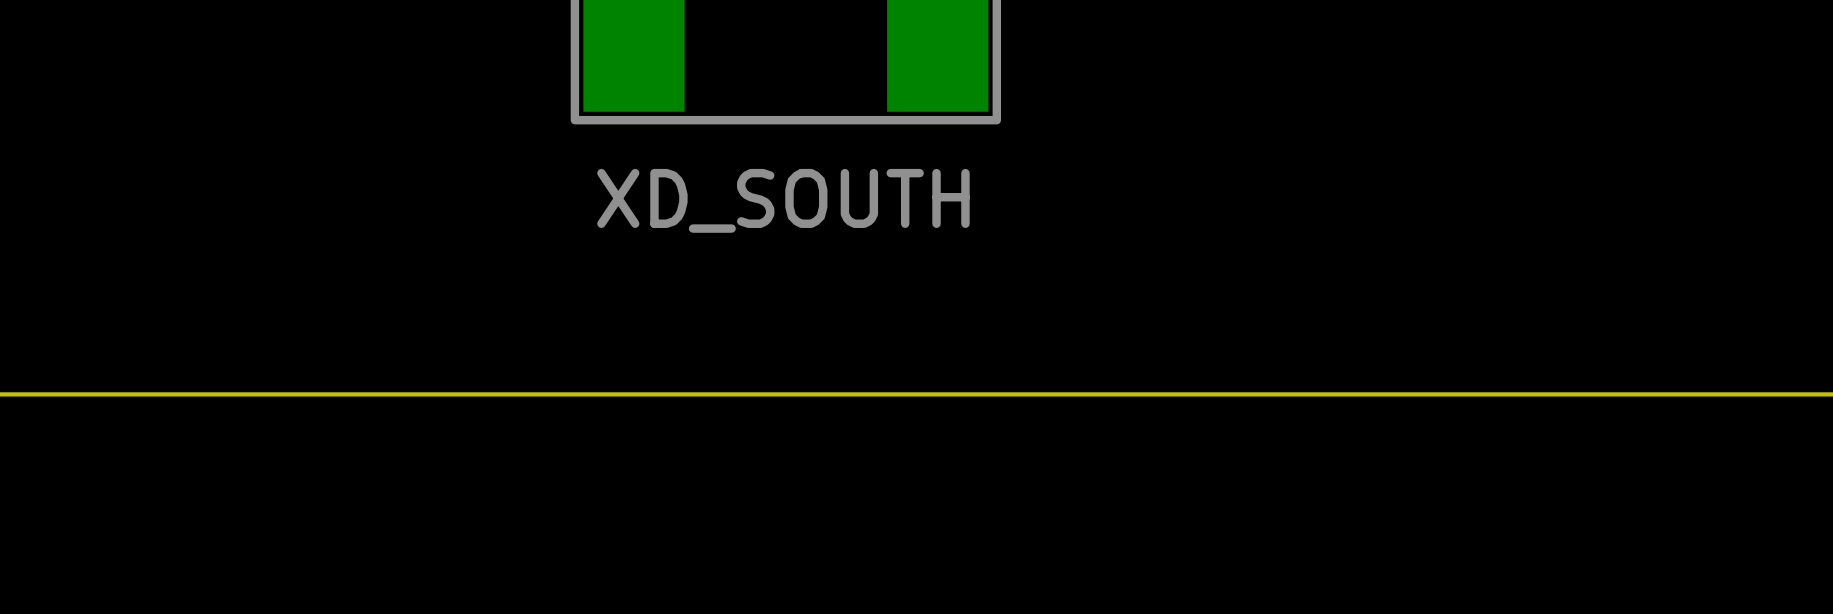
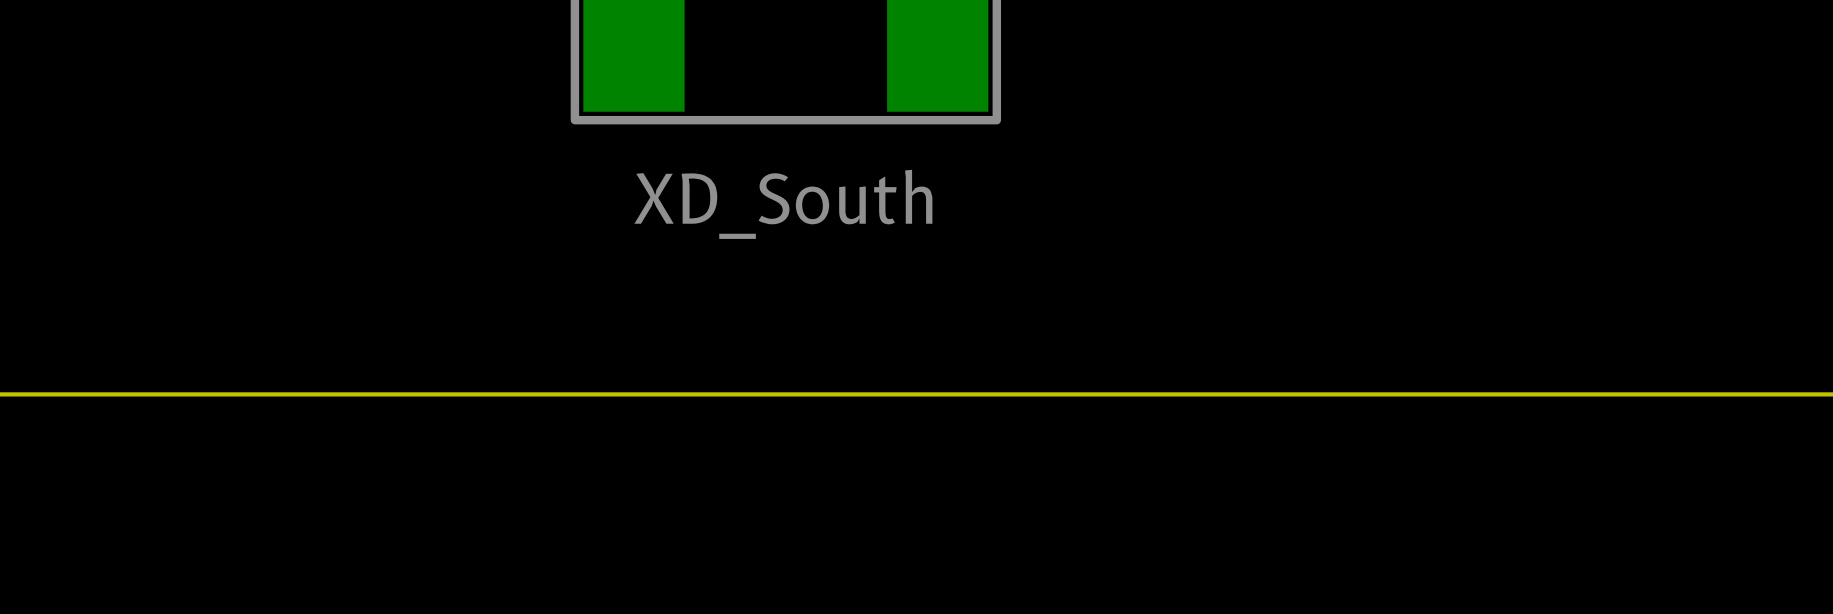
part value: XD_SOUTH (783, 200) -> XD_South (783, 204)

